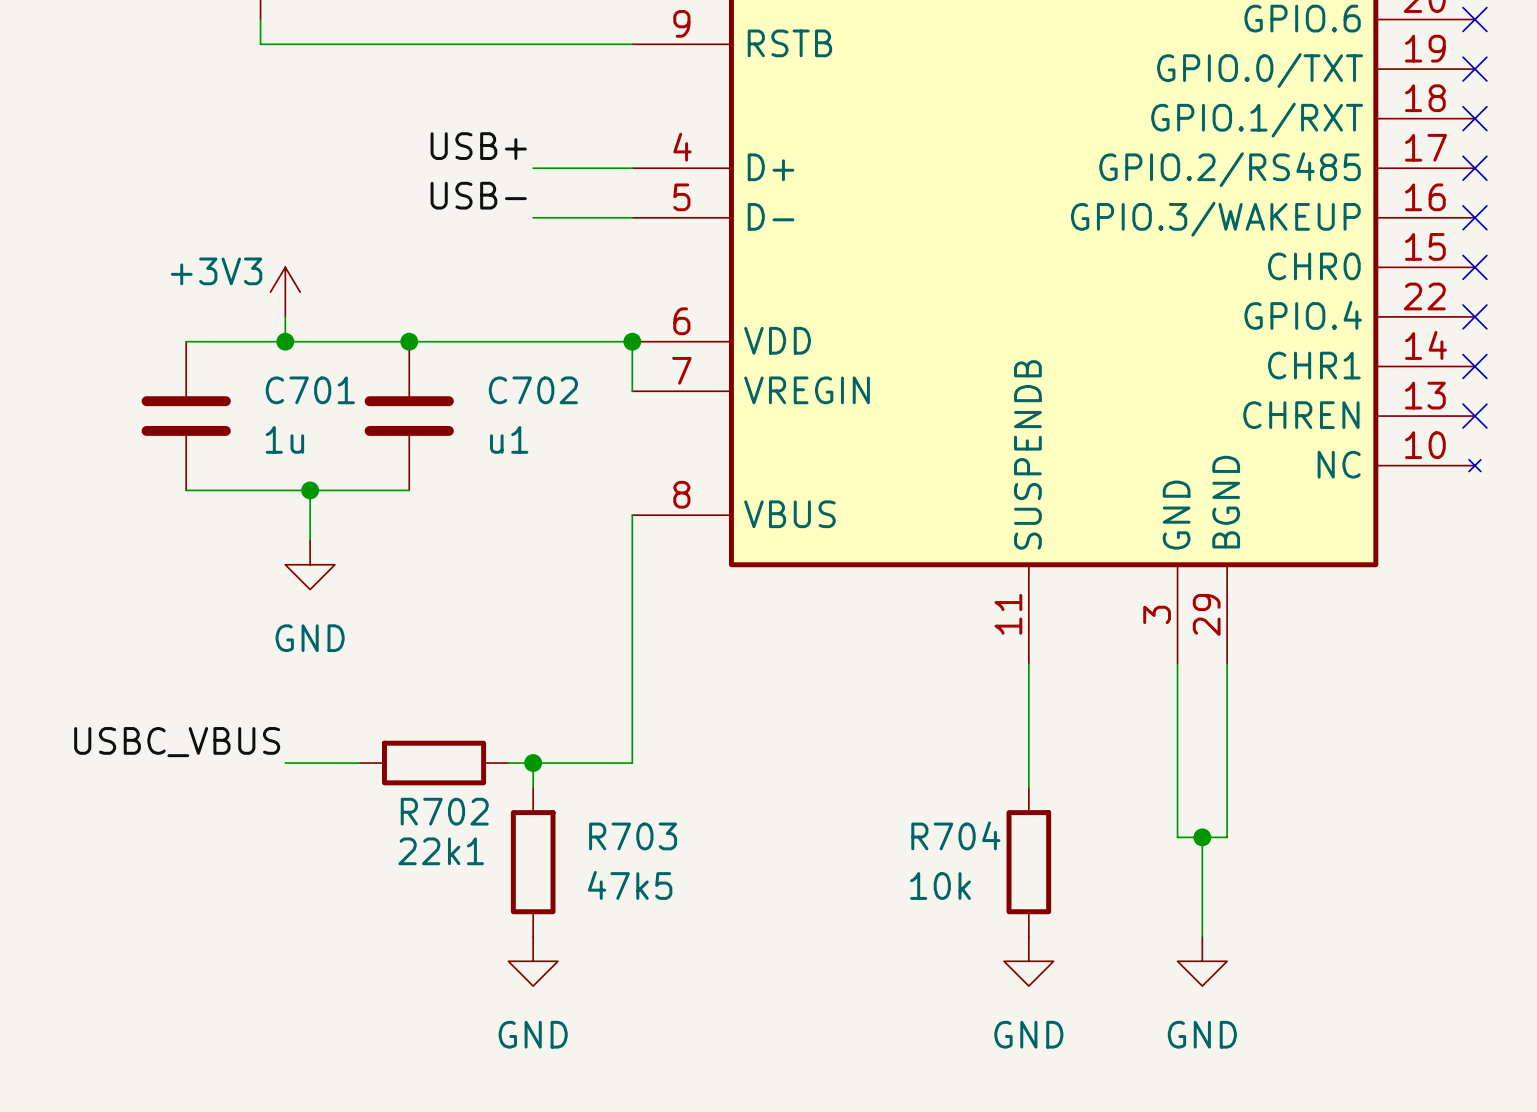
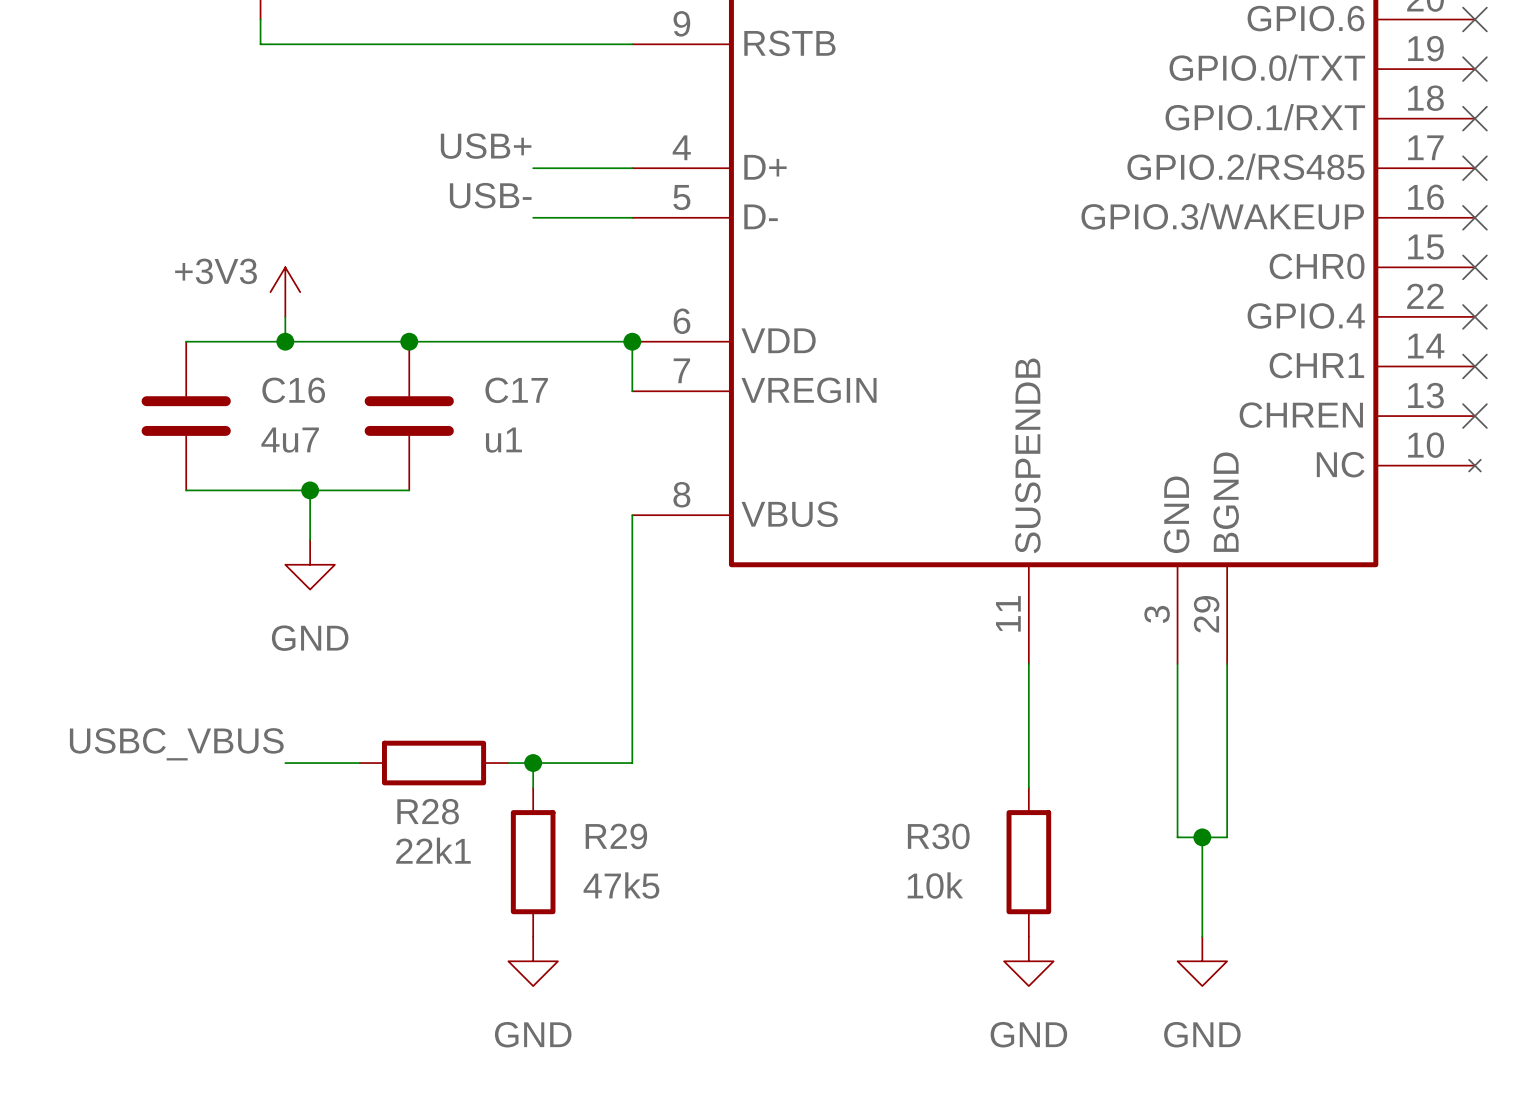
C701 name: C701 (310, 390) -> C16 (293, 390)
C702 name: C702 (533, 390) -> C17 (516, 390)
C701 value: 1u (284, 439) -> 4u7 (290, 440)
R702 name: R702 (444, 811) -> R28 (428, 811)
R704 name: R704 (955, 835) -> R30 (938, 836)
R703 name: R703 (633, 836) -> R29 (616, 836)

